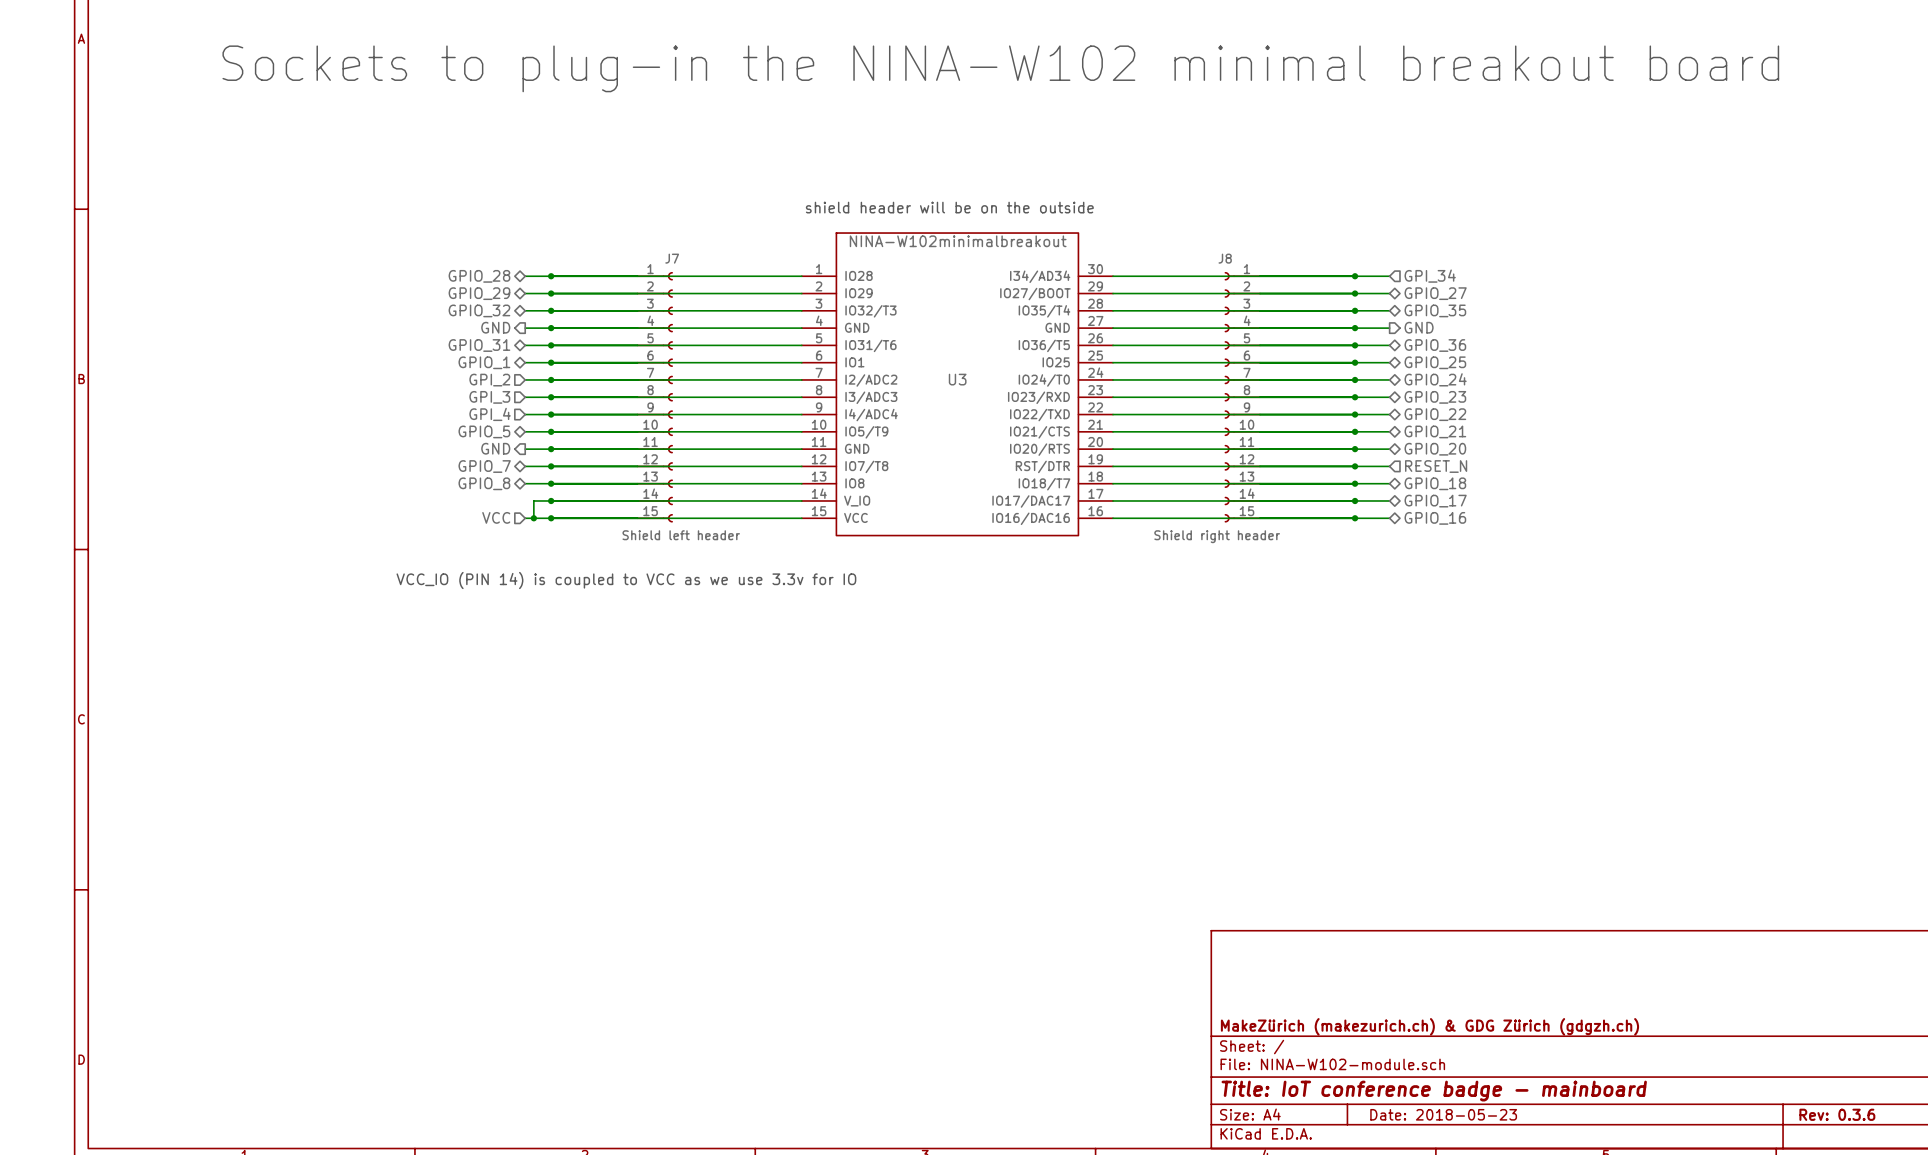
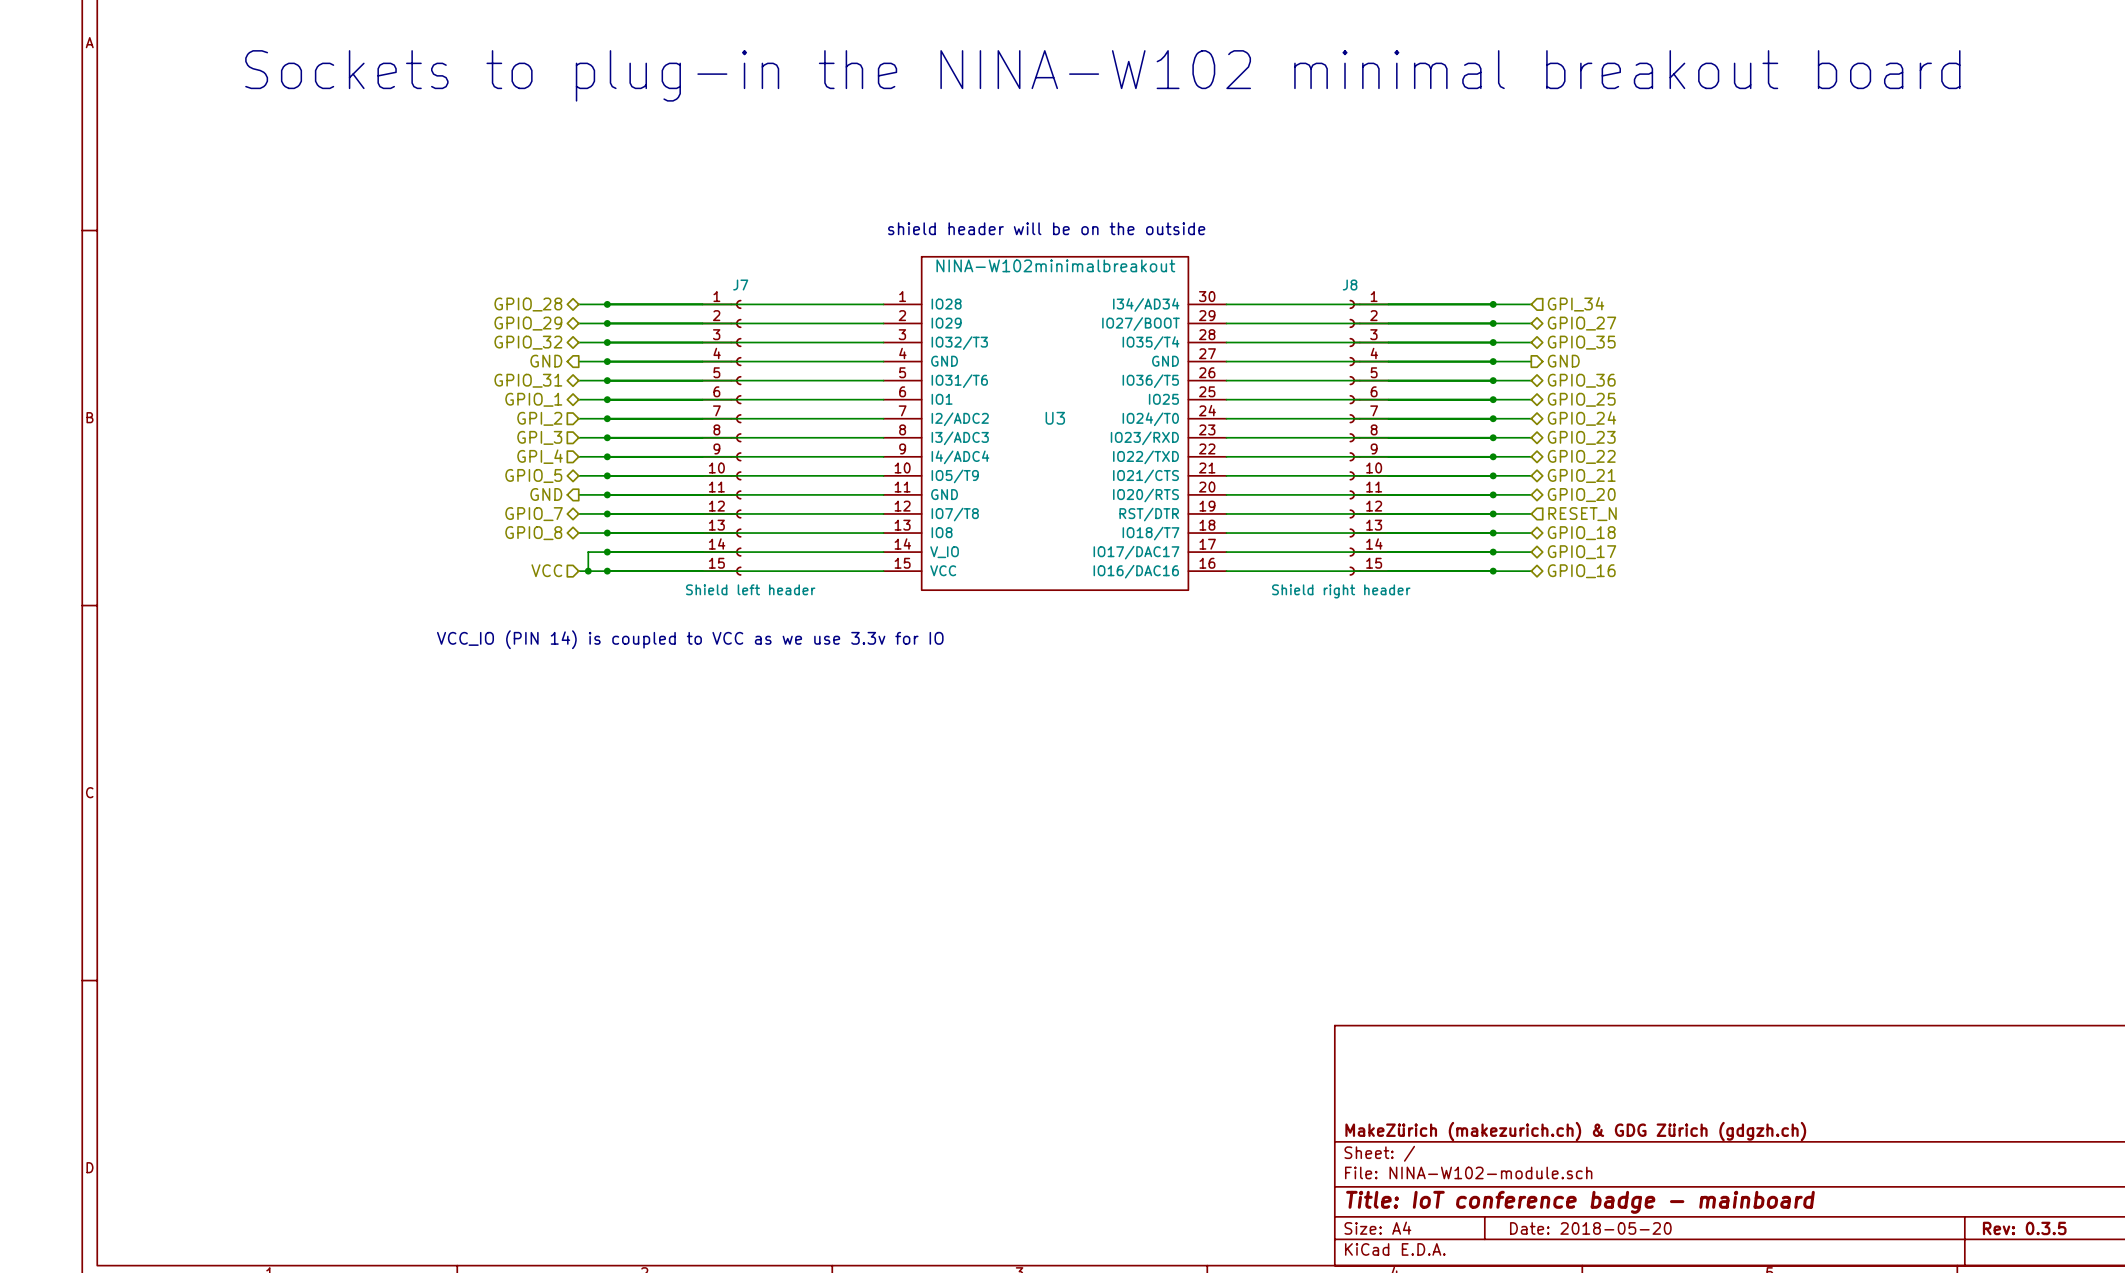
title block: Date: 2018-05-23 (1443, 1114) -> Date: 2018-05-20 (1590, 1228)
title block: Rev: 0.3.6 (1837, 1114) -> Rev: 0.3.5 (2024, 1228)

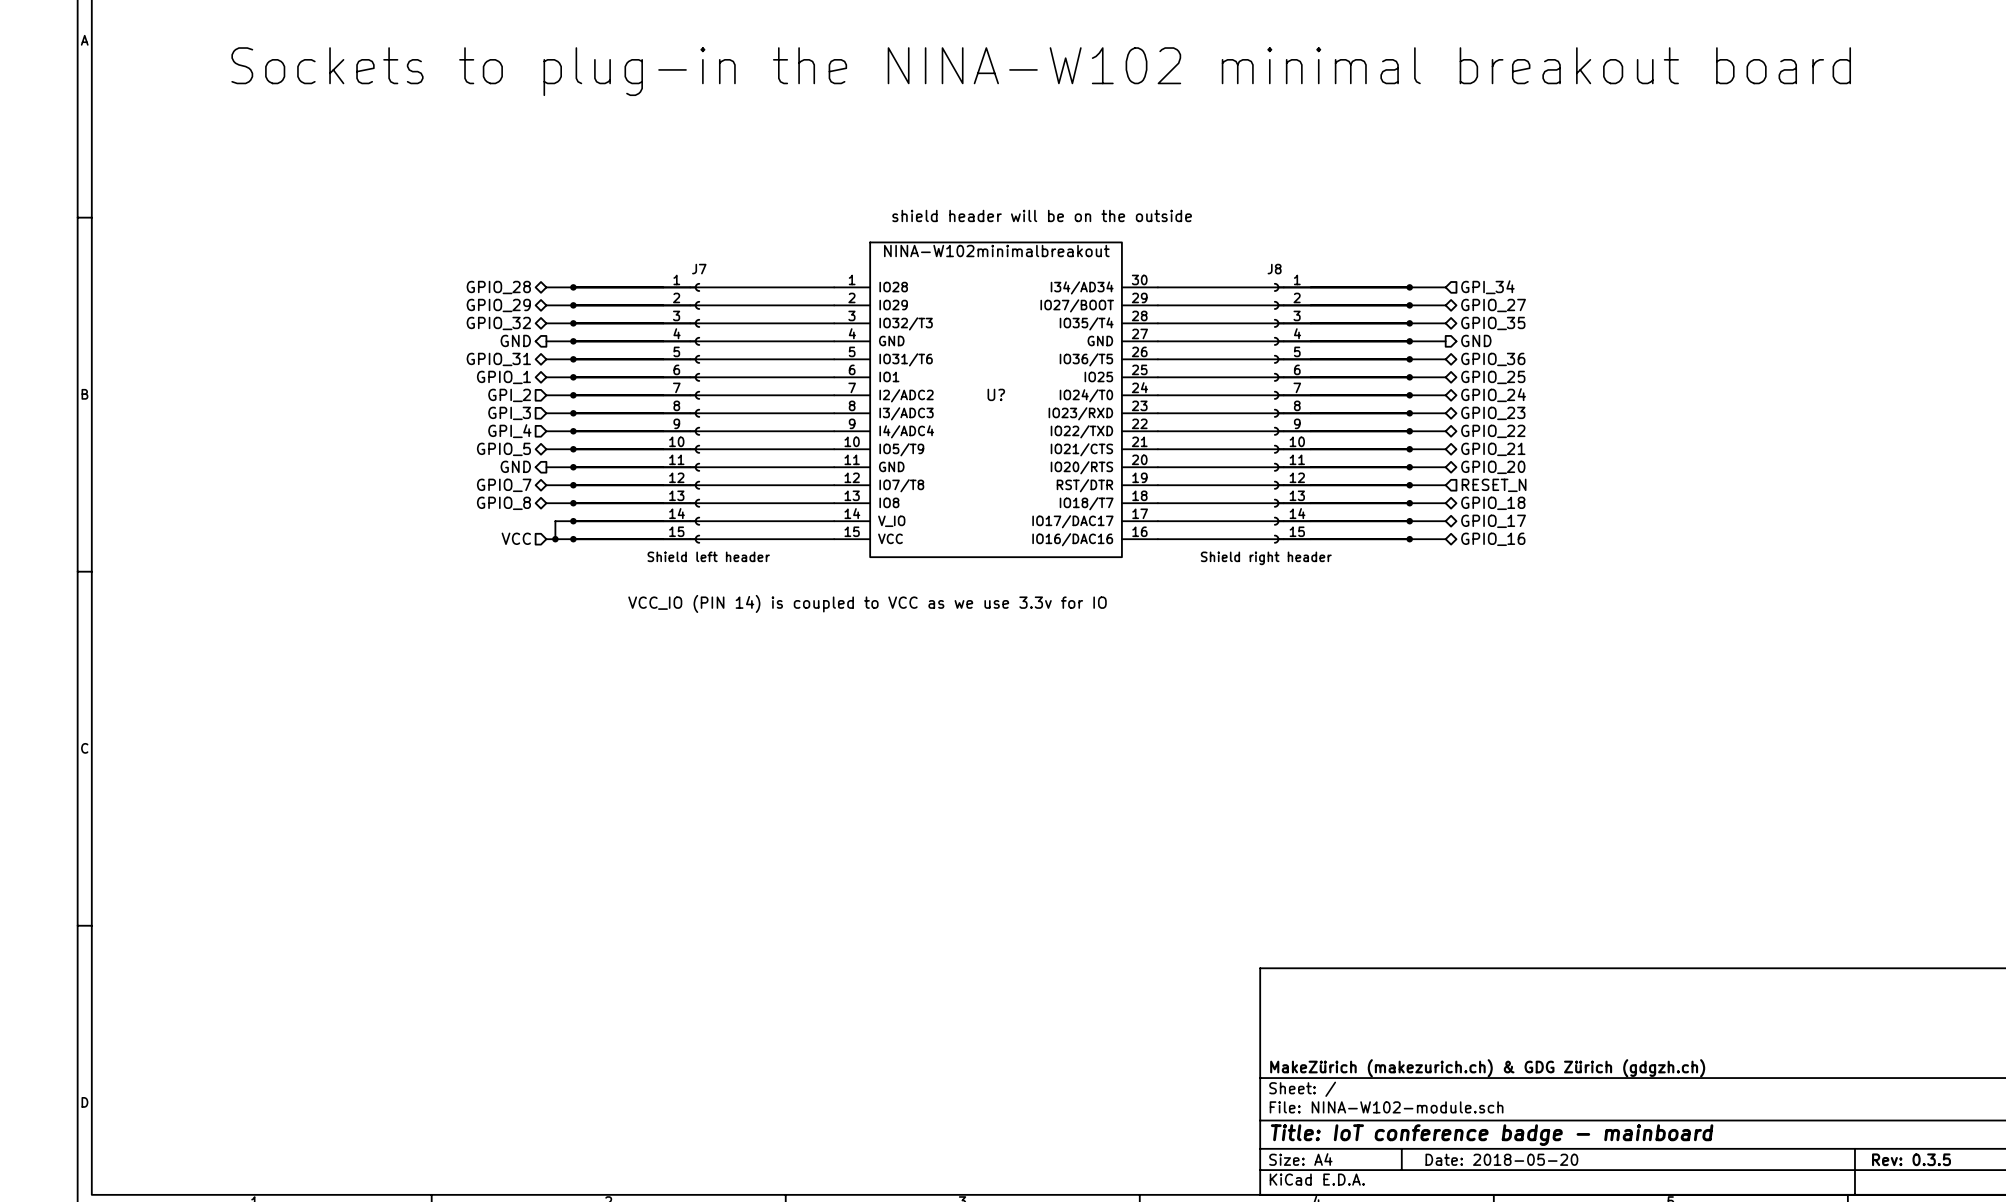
text position: shield header will be on the outside (1046, 228) -> shield header will be on the outside (1042, 215)
U3 name: U3 (1055, 418) -> U? (996, 394)
text: VCC_IO (PIN 14) is coupled to VCC as we use 3.3v for IO (690, 639) -> none
text: none -> VCC_IO (PIN 14) is coupled to VCC as we use 3.3v for IO (867, 603)

